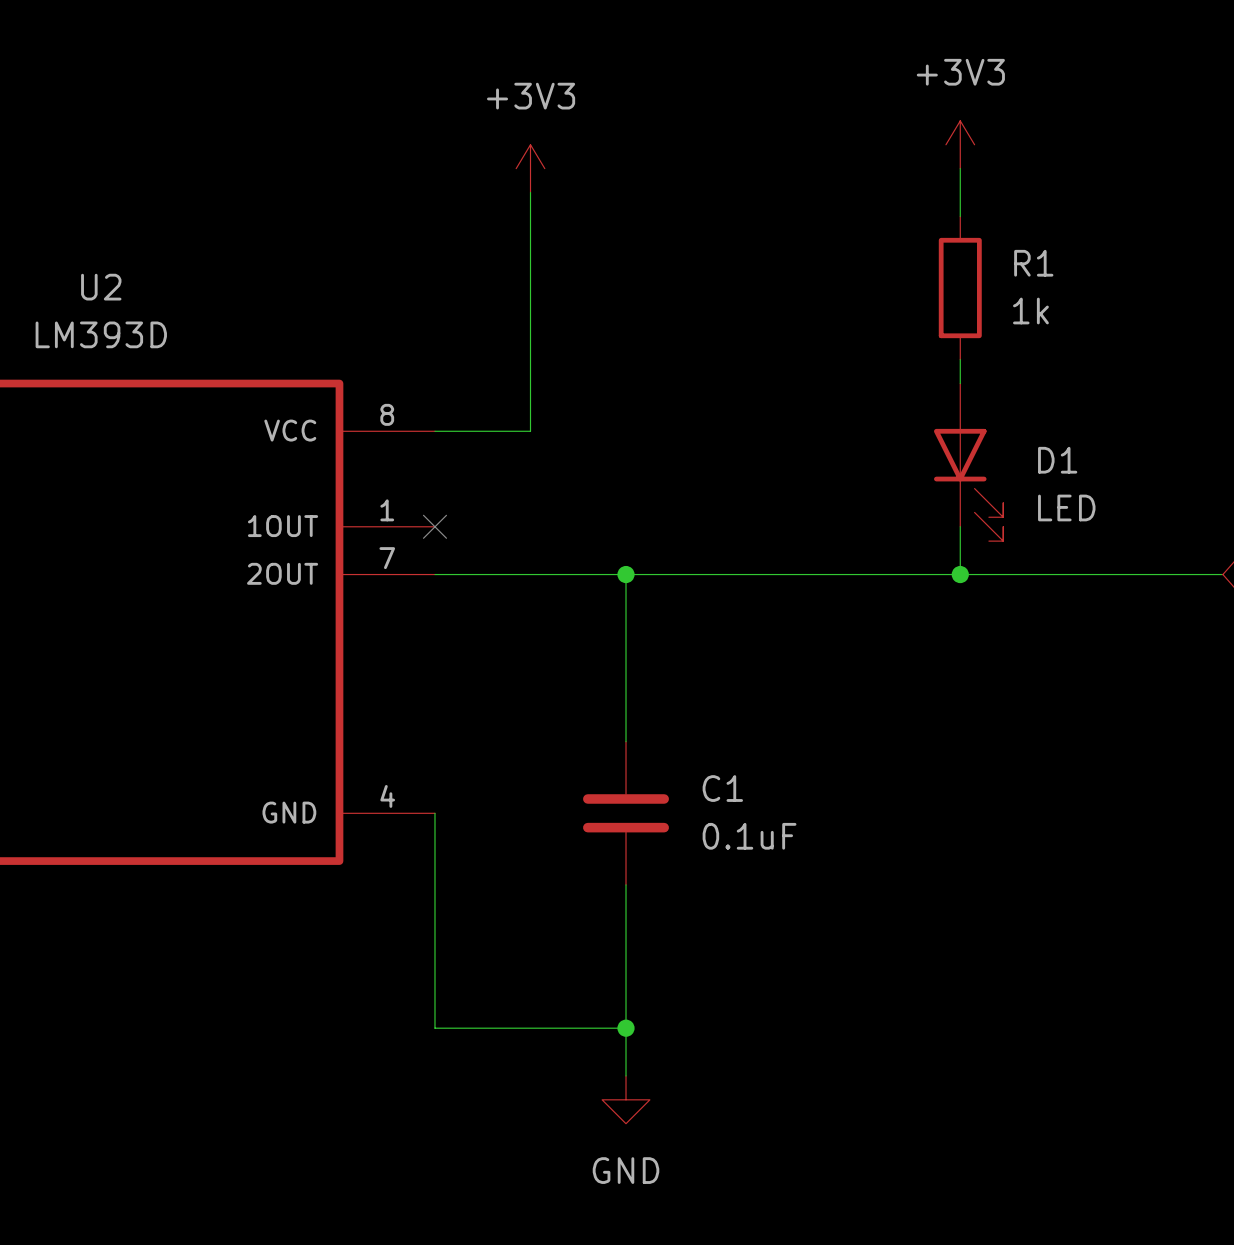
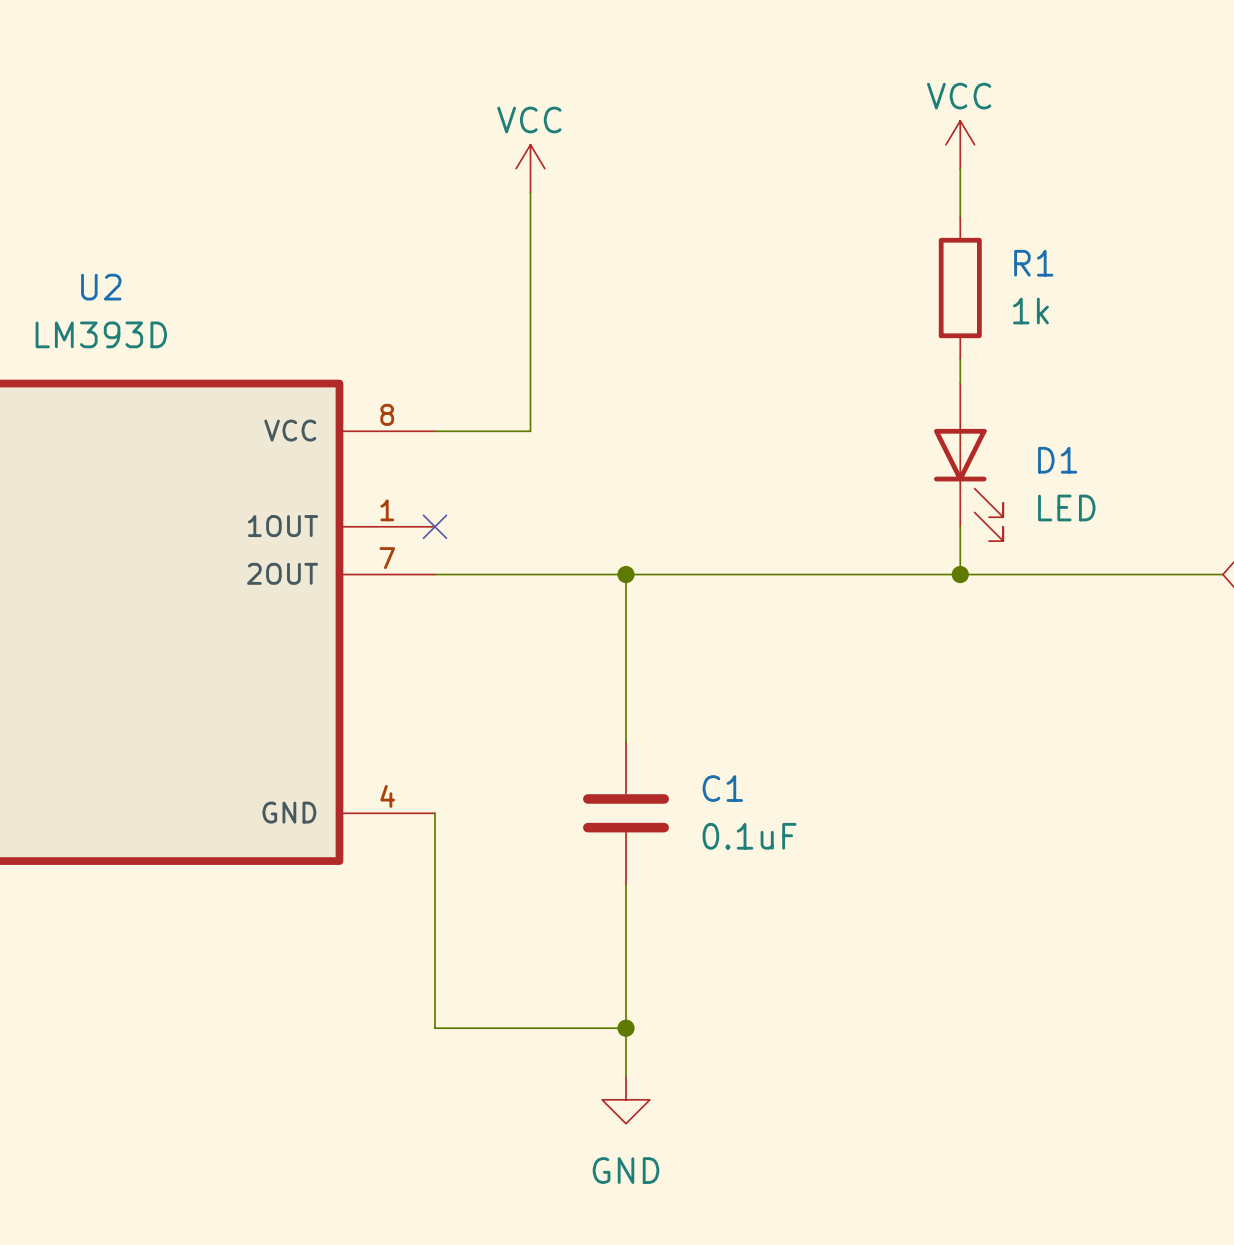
power symbol: +3V3 (960, 144) -> VCC (960, 144)
power symbol: +3V3 (530, 168) -> VCC (530, 168)

